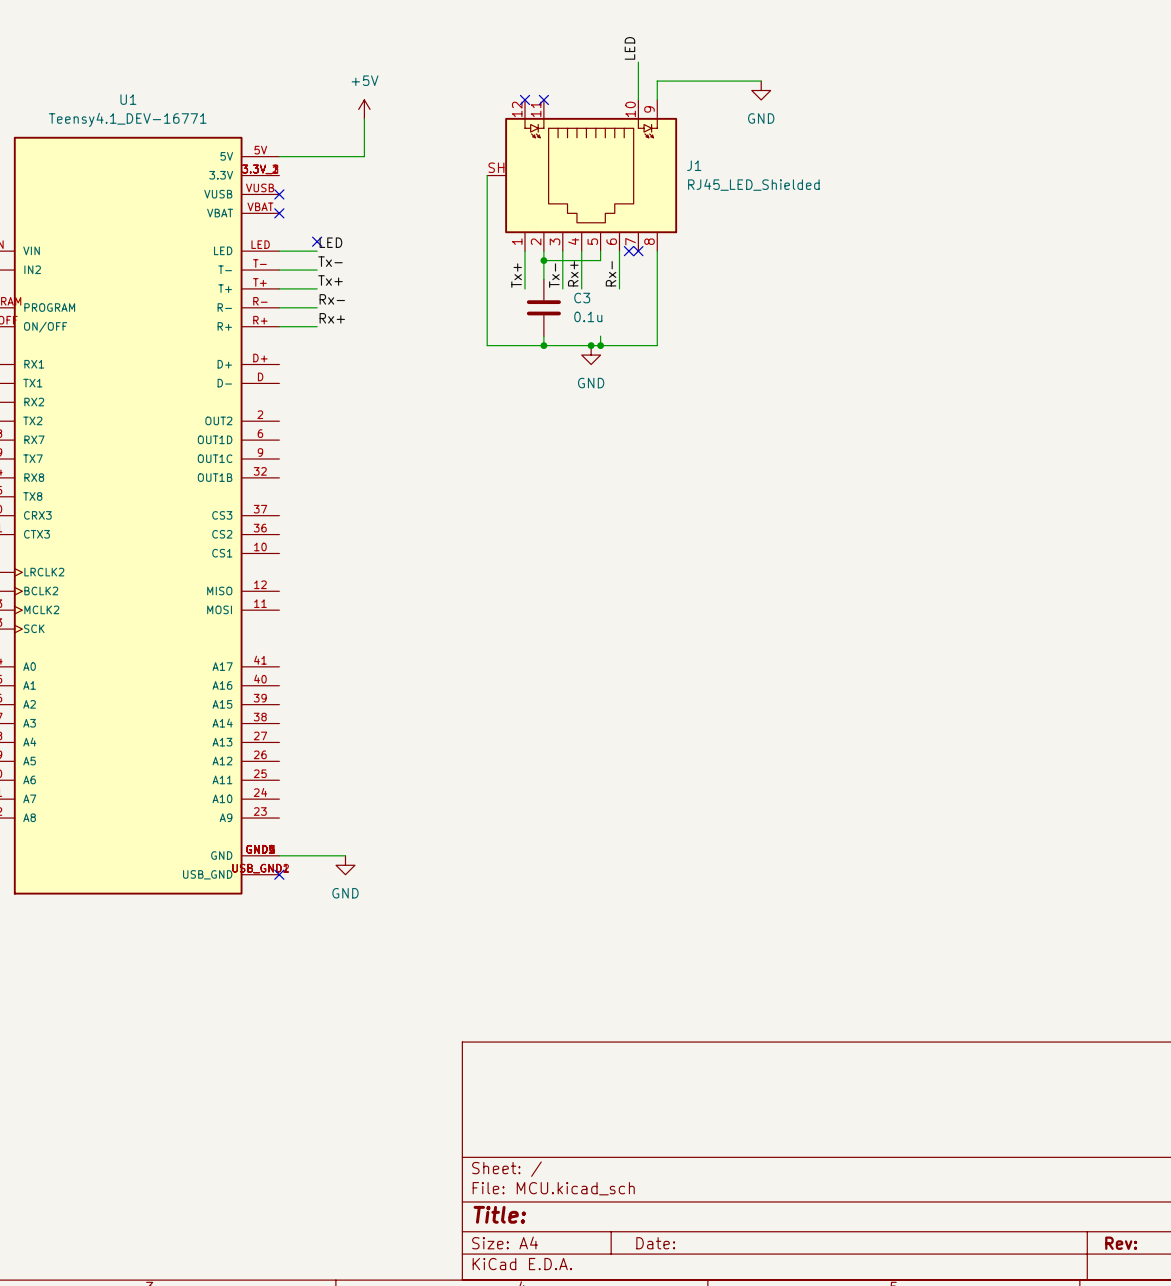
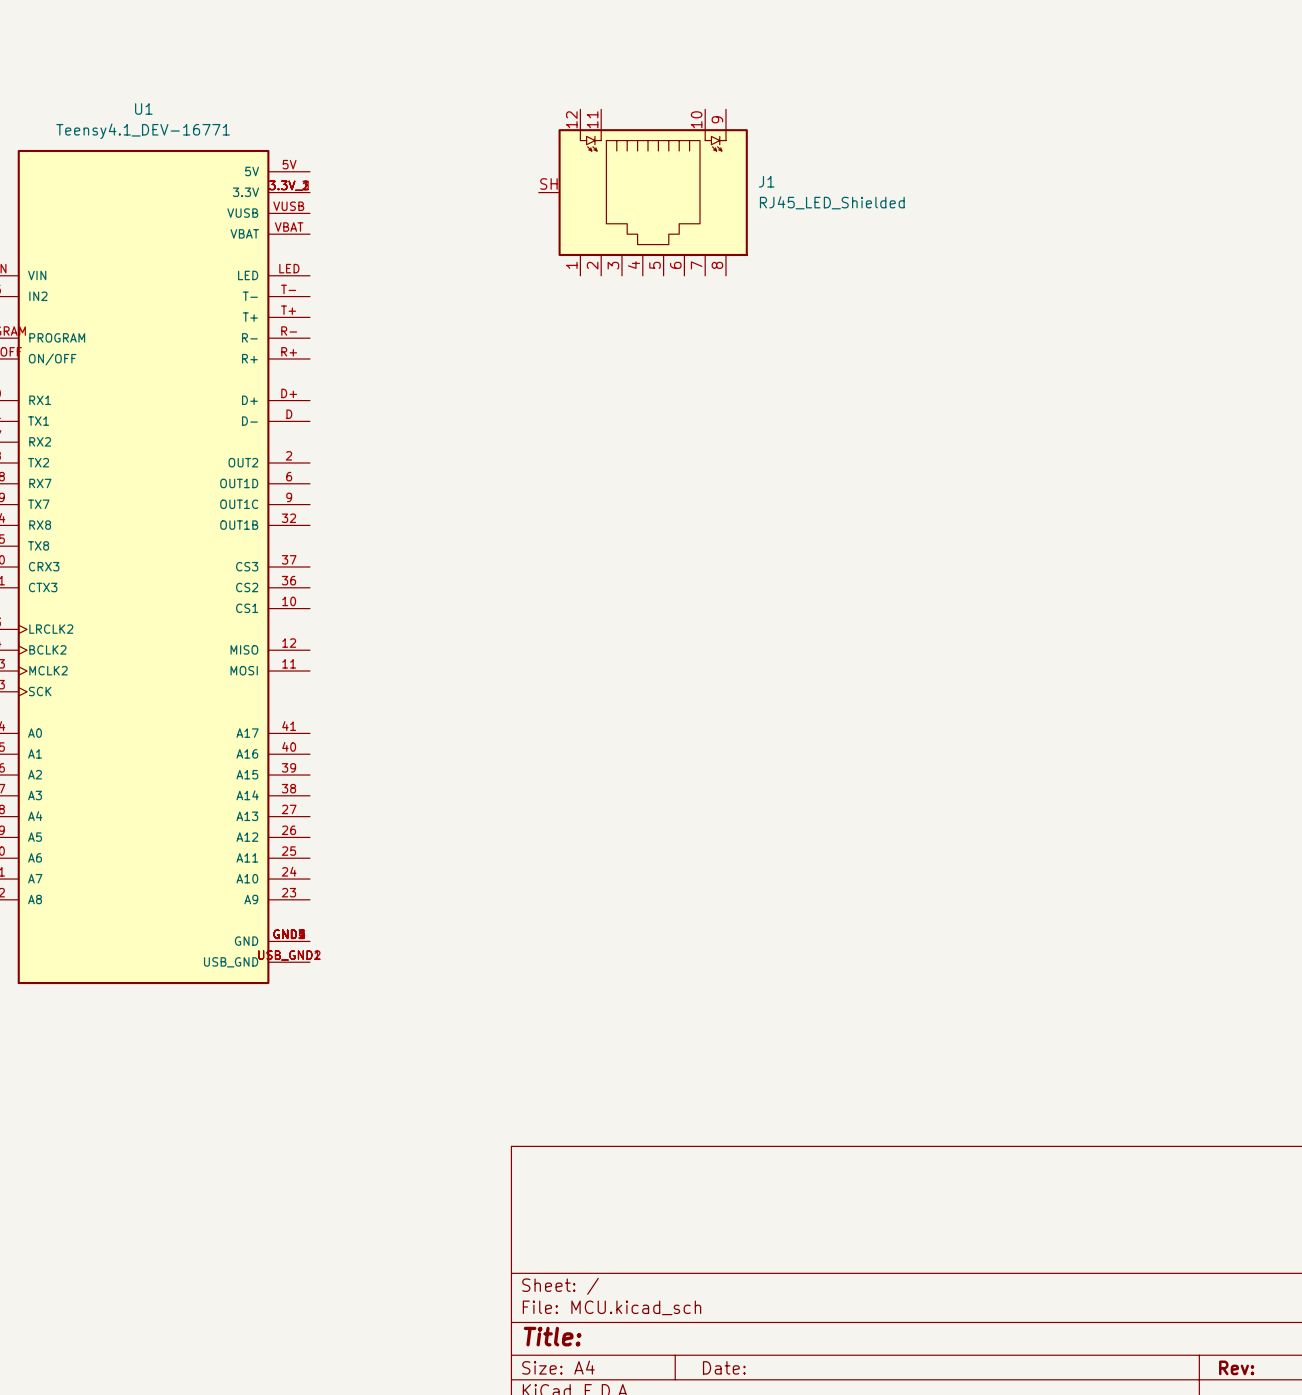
label: LED (629, 48) -> none
wire: (638, 62) (638, 99) -> none
wire: (761, 81) (657, 81) (657, 99) -> none
power symbol: GND (761, 90) -> none
no-connect mark: (525, 99) -> none
no-connect mark: (543, 99) -> none
power symbol: +5V (364, 109) -> none
wire: (364, 118) (364, 156) (279, 156) -> none
wire: (487, 175) (487, 345) (657, 345) (657, 251) -> none
no-connect mark: (279, 194) -> none
no-connect mark: (279, 213) -> none
no-connect mark: (317, 241) -> none
label: LED (330, 242) -> none
wire: (279, 251) (317, 251) -> none
wire: (525, 251) (525, 288) -> none
wire: (543, 251) (543, 279) -> none
wire: (562, 251) (562, 288) -> none
wire: (581, 251) (581, 288) -> none
wire: (600, 251) (600, 260) (543, 260) -> none
wire: (619, 251) (619, 288) -> none
no-connect mark: (628, 251) -> none
no-connect mark: (638, 251) -> none
junction: (543, 260) -> none
label: Tx- (330, 261) -> none
wire: (279, 270) (317, 270) -> none
label: Rx+ (573, 273) -> none
label: Rx- (611, 273) -> none
label: Tx+ (516, 275) -> none
label: Tx- (554, 275) -> none
label: Tx+ (330, 280) -> none
wire: (279, 288) (317, 288) -> none
label: Rx- (332, 299) -> none
wire: (279, 307) (317, 307) -> none
C3: 0.1u (543, 307) -> none
label: Rx+ (332, 318) -> none
wire: (279, 326) (317, 326) -> none
wire: (543, 336) (543, 345) -> none
wire: (600, 336) (600, 345) -> none
junction: (543, 345) -> none
junction: (591, 345) -> none
junction: (600, 345) -> none
power symbol: GND (591, 355) -> none
wire: (279, 855) (345, 855) -> none
power symbol: GND (345, 865) -> none
no-connect mark: (279, 874) -> none

